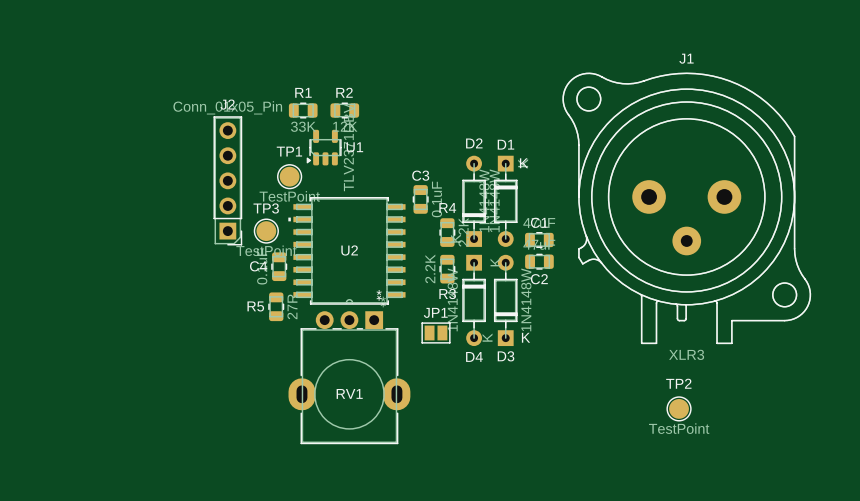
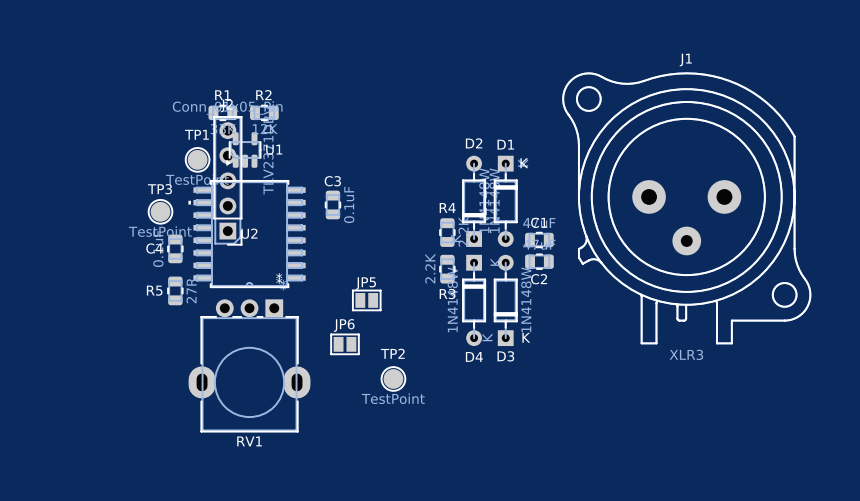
R1 position: (303, 110) -> (222, 112)
R2 position: (344, 110) -> (264, 112)
U1 position: (324, 147) -> (243, 149)
TP1 position: (289, 176) -> (197, 159)
C3 position: (420, 199) -> (332, 204)
TP3 position: (266, 231) -> (160, 211)
U2 position: (346, 250) -> (247, 234)
C4 position: (279, 266) -> (175, 248)
JP5: none -> (366, 300)
R5 position: (276, 306) -> (175, 290)
JP1: (436, 332) -> none
JP6: none -> (344, 344)
RV1 position: (349, 377) -> (249, 365)
RV1 name position: RV1 (349, 393) -> RV1 (249, 441)
TP2 position: (679, 408) -> (393, 378)

